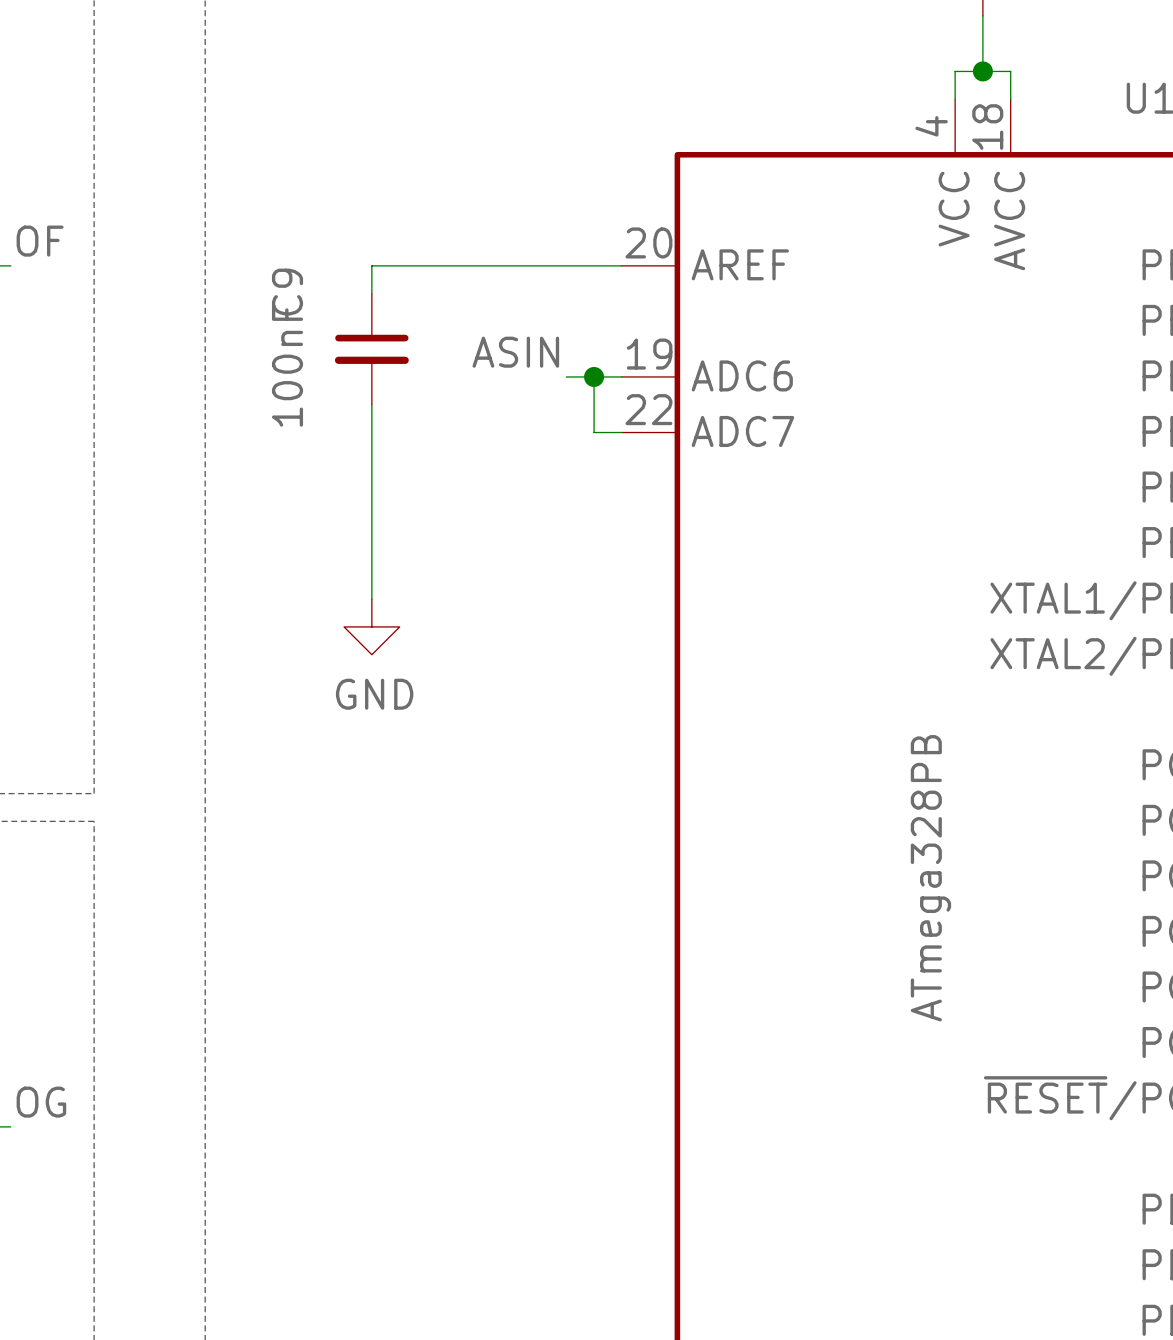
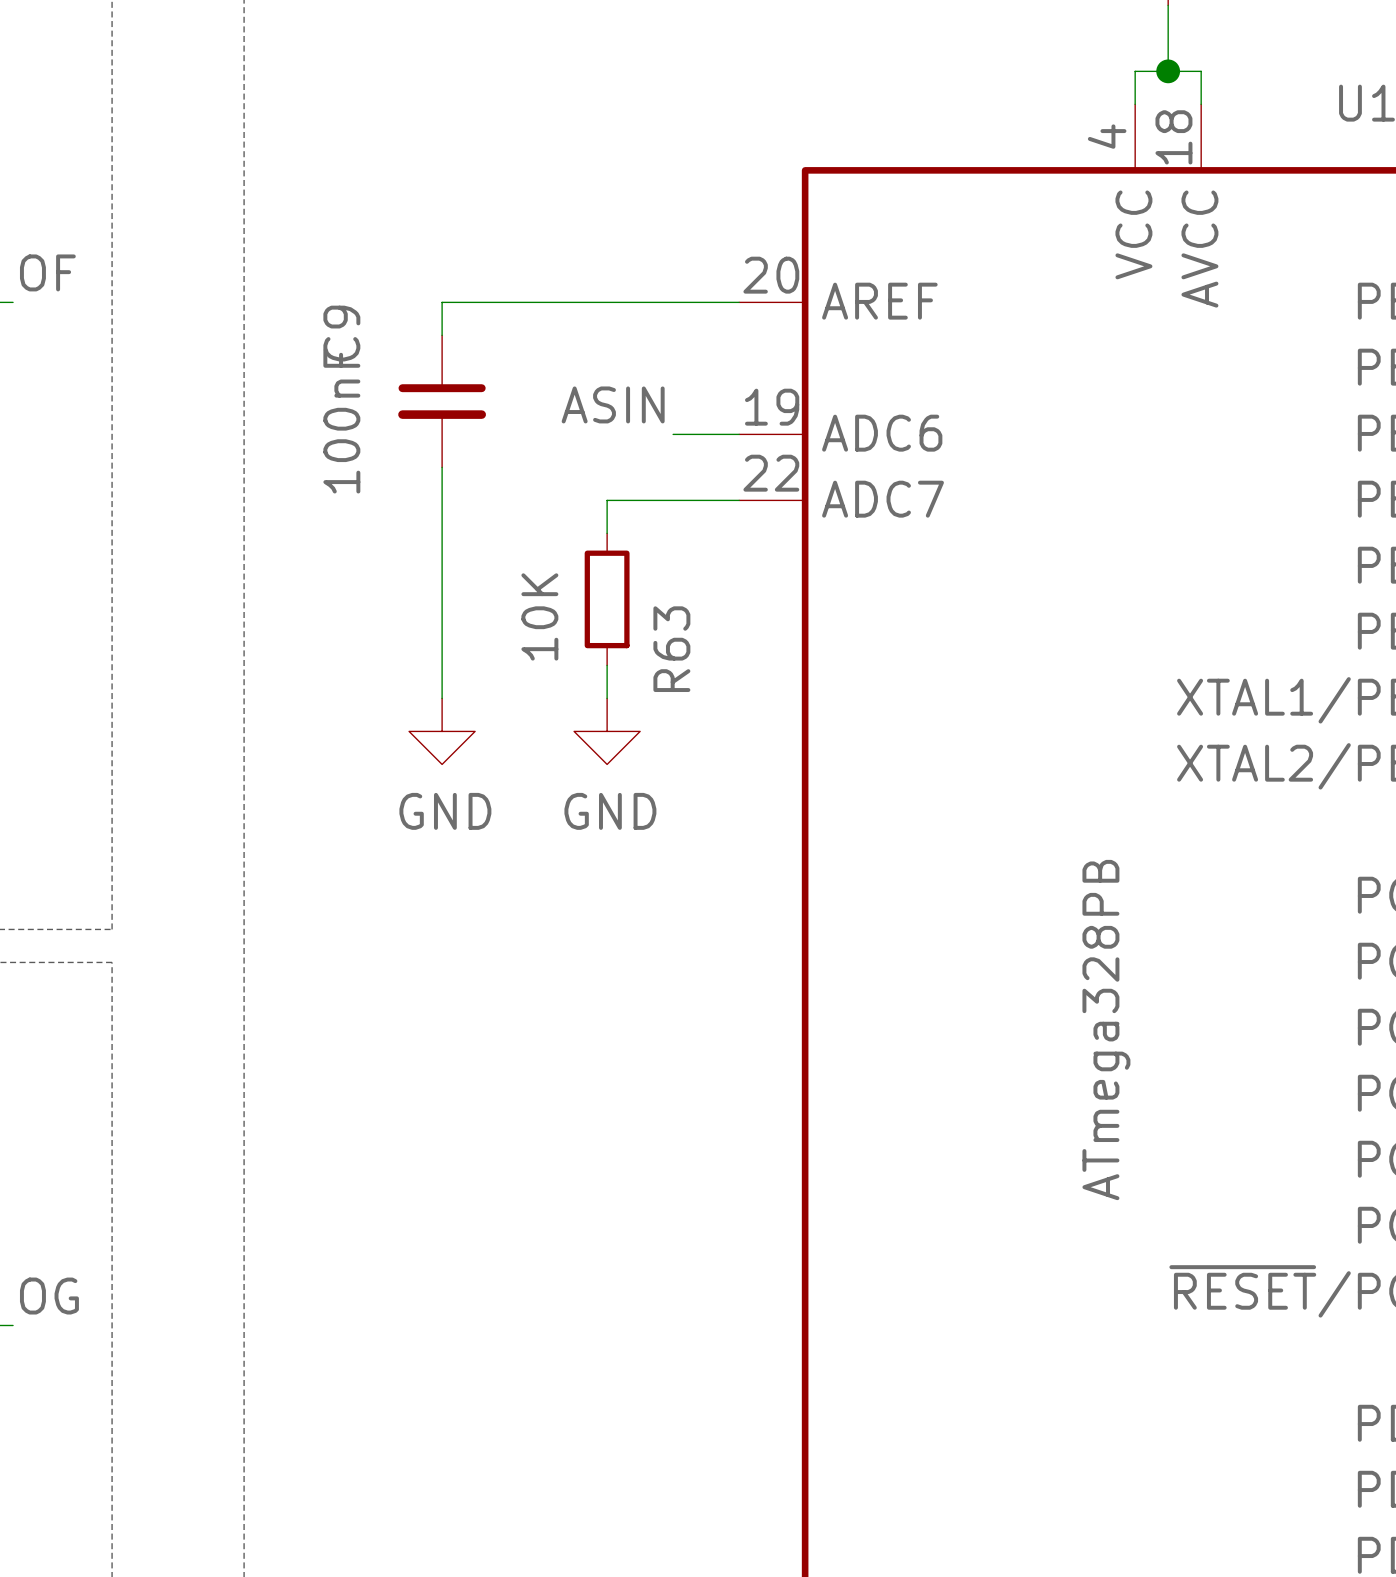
wire: (594, 376) (594, 432) -> (607, 533) (607, 500) (706, 500)
junction: (594, 376) -> none
R63: none -> 10K (607, 599)
wire: none -> (607, 665) (607, 698)
power symbol: none -> GND (607, 731)

